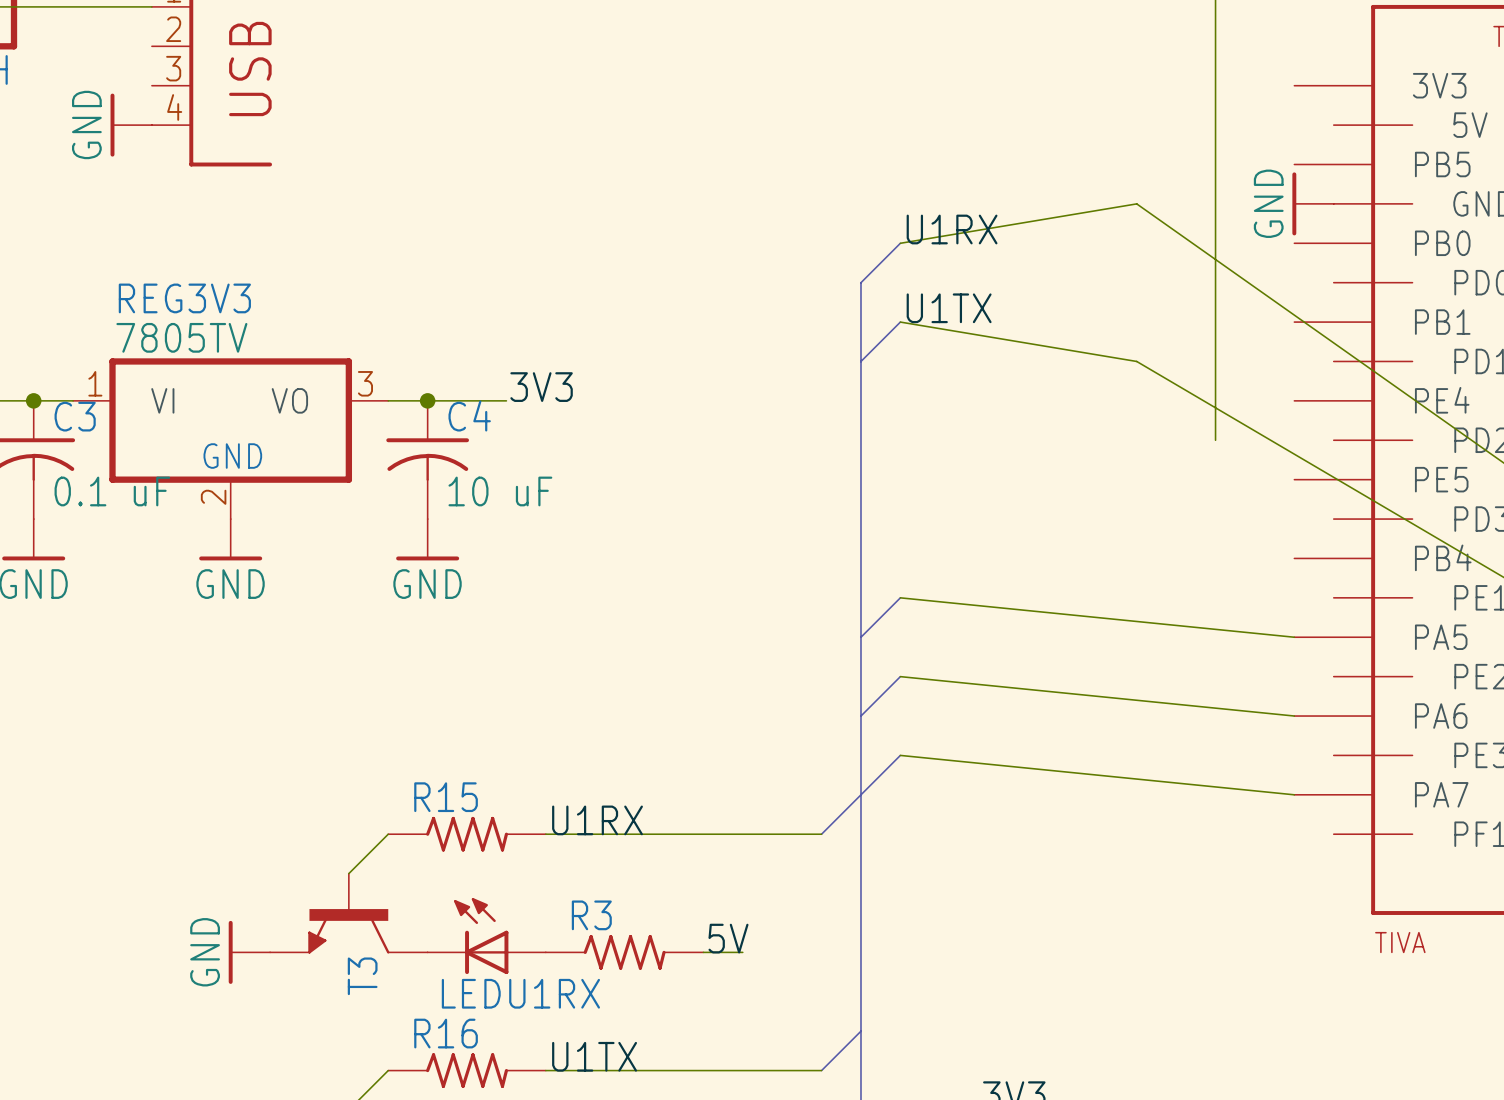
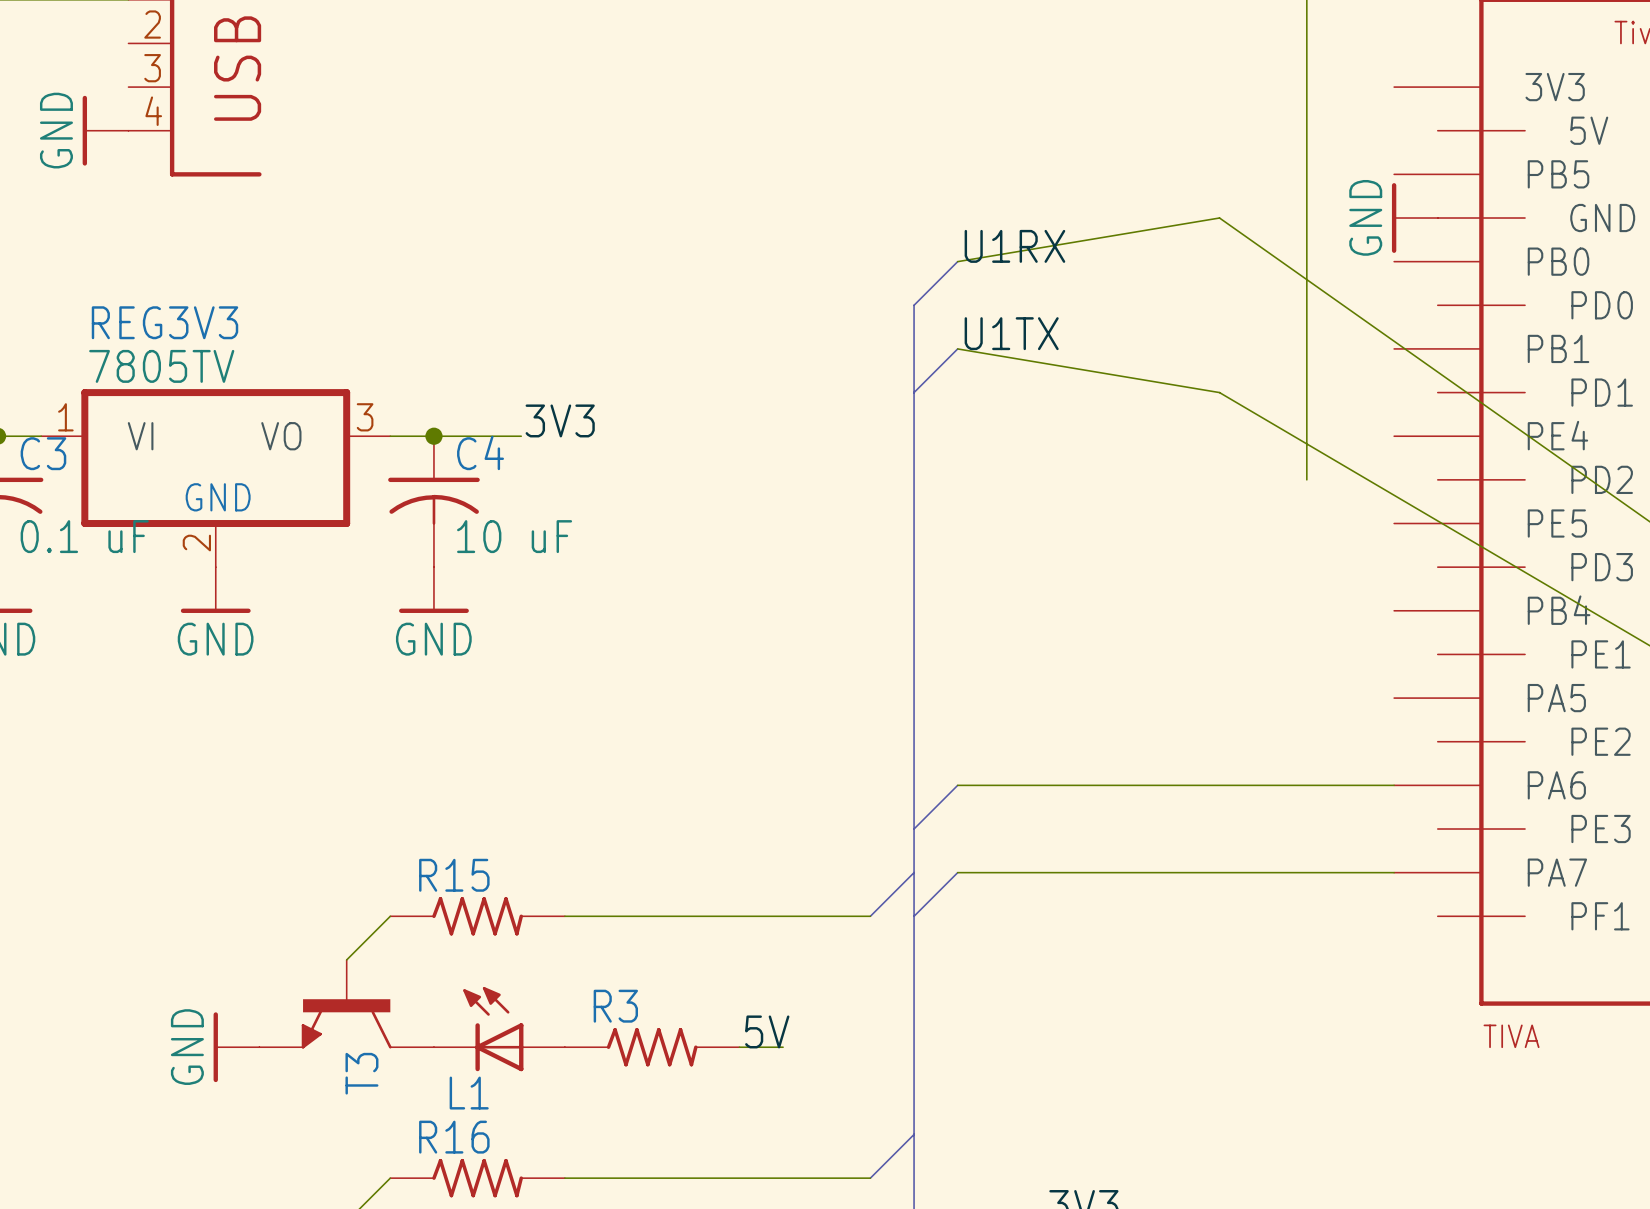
bus: (900, 597) (860, 637) -> none
wire: (900, 597) (1294, 637) -> none
bus: (900, 676) (860, 716) -> (957, 872) (914, 916)
wire: (900, 676) (1294, 716) -> (957, 785) (1394, 785)
bus: (900, 755) (860, 794) -> (957, 785) (914, 829)
wire: (900, 755) (1294, 794) -> (957, 872) (1394, 872)
label: U1RX (597, 820) -> none
LEDU1RX name: LEDU1RX (520, 993) -> L1 (469, 1093)
label: U1TX (594, 1056) -> none

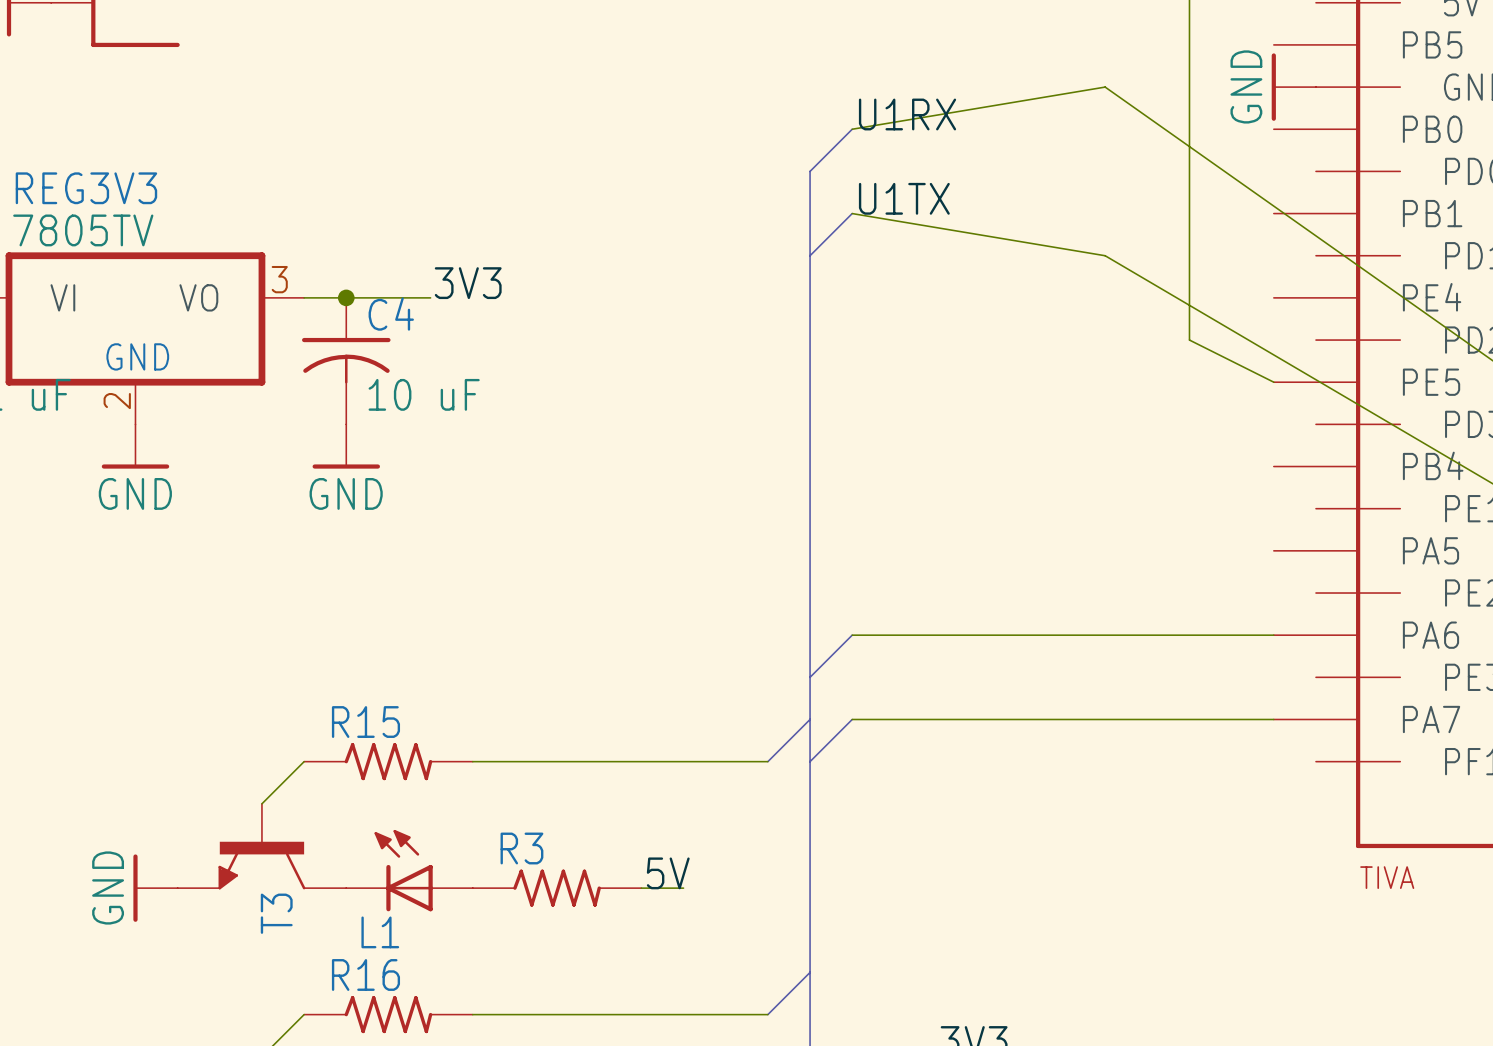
wire: none -> (1189, 340) (1273, 382)

